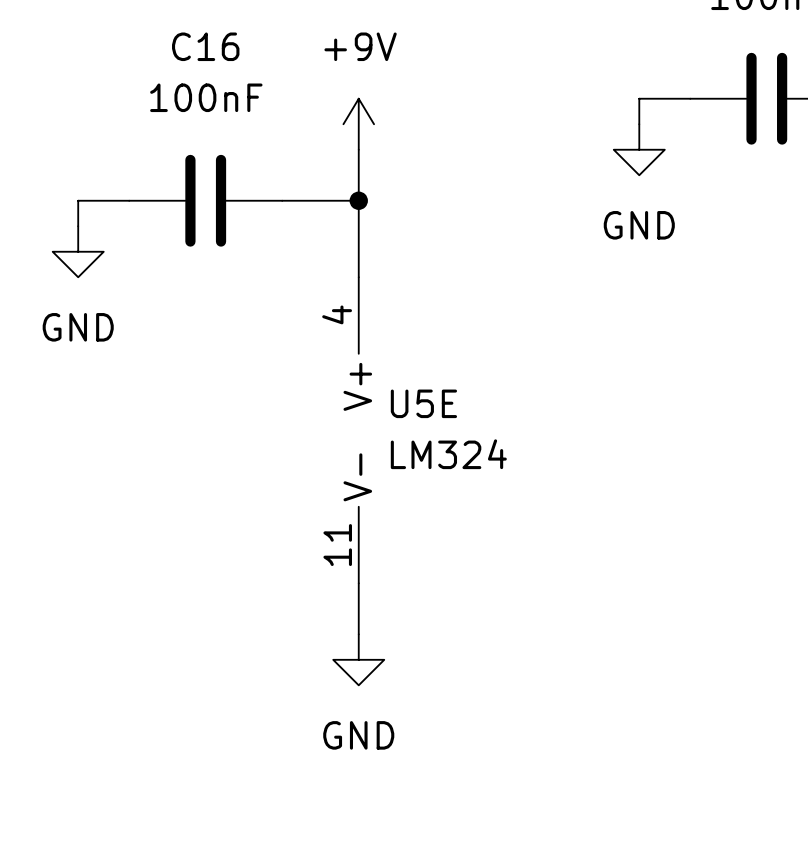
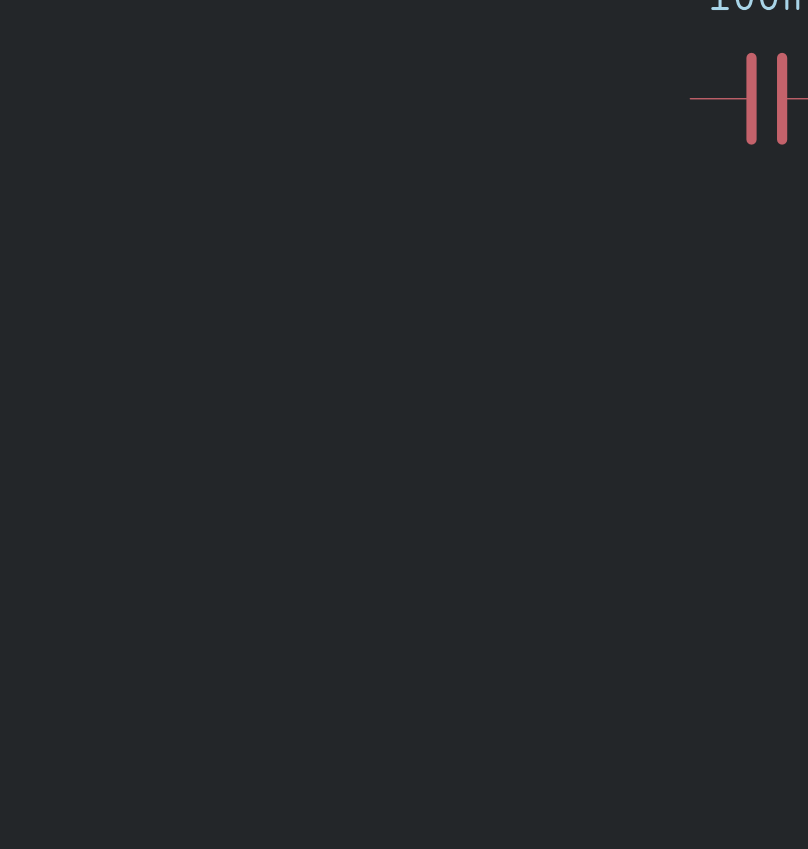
wire: (690, 98) (639, 98) (639, 124) -> none
power symbol: +9V (358, 124) -> none
wire: (358, 149) (358, 277) -> none
power symbol: GND (639, 149) -> none
wire: (129, 200) (78, 200) (78, 226) -> none
C16: 100nF (205, 200) -> none
wire: (282, 200) (358, 200) -> none
junction: (358, 200) -> none
power symbol: GND (78, 251) -> none
U5E: LM324 (358, 430) -> none
wire: (358, 583) (358, 634) -> none
power symbol: GND (358, 659) -> none

